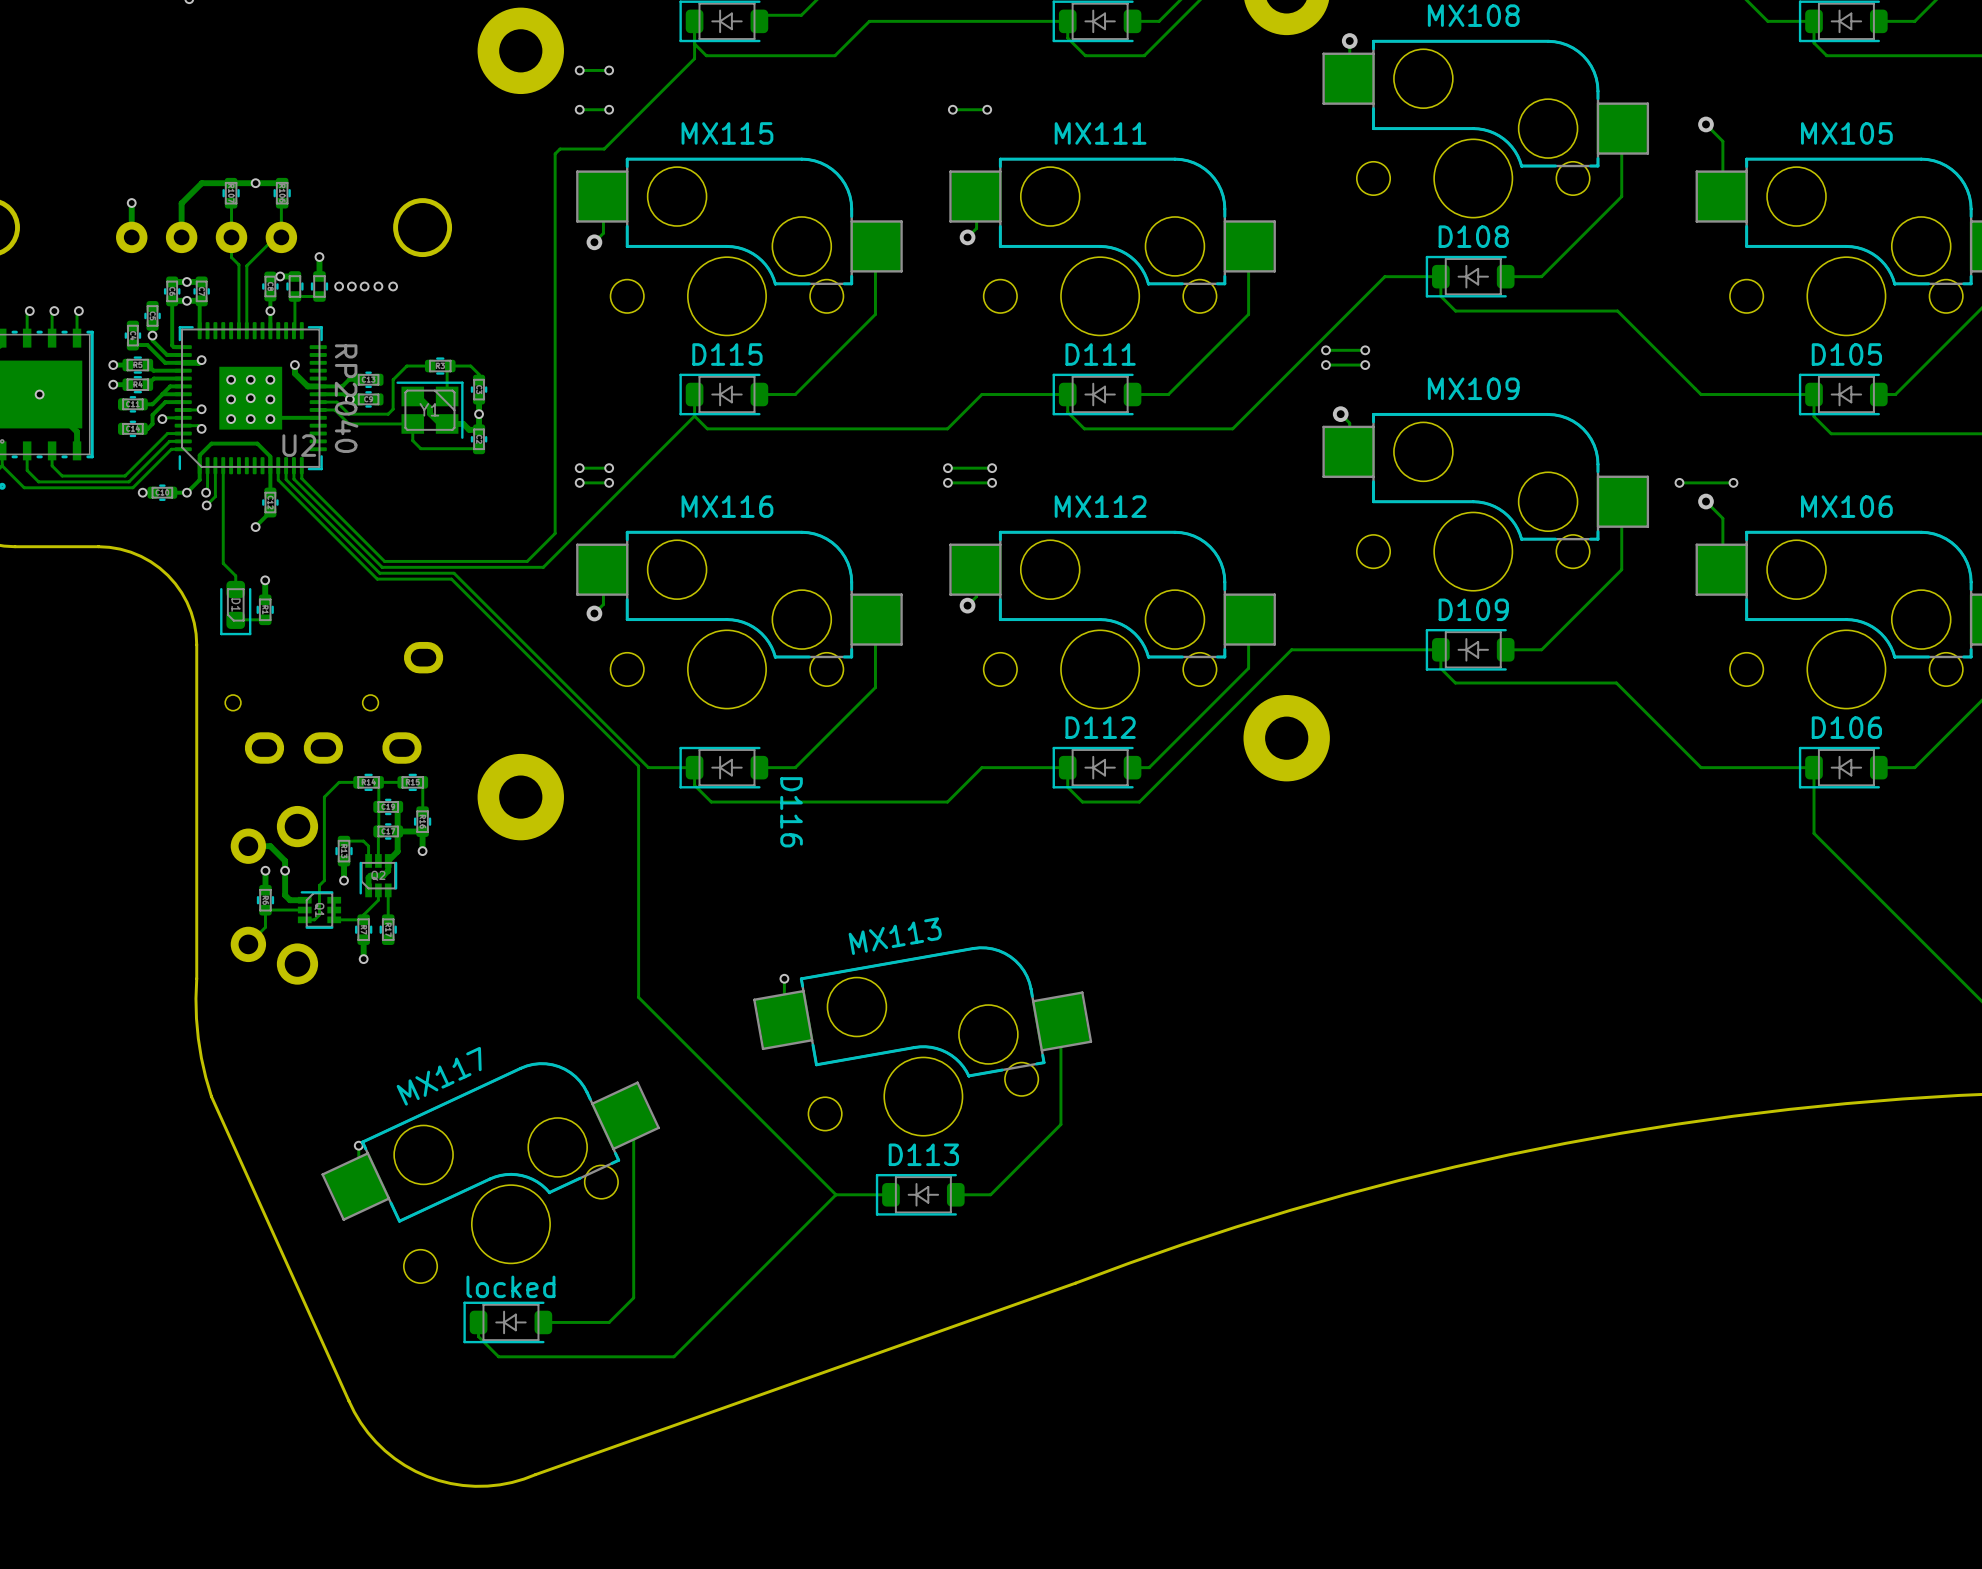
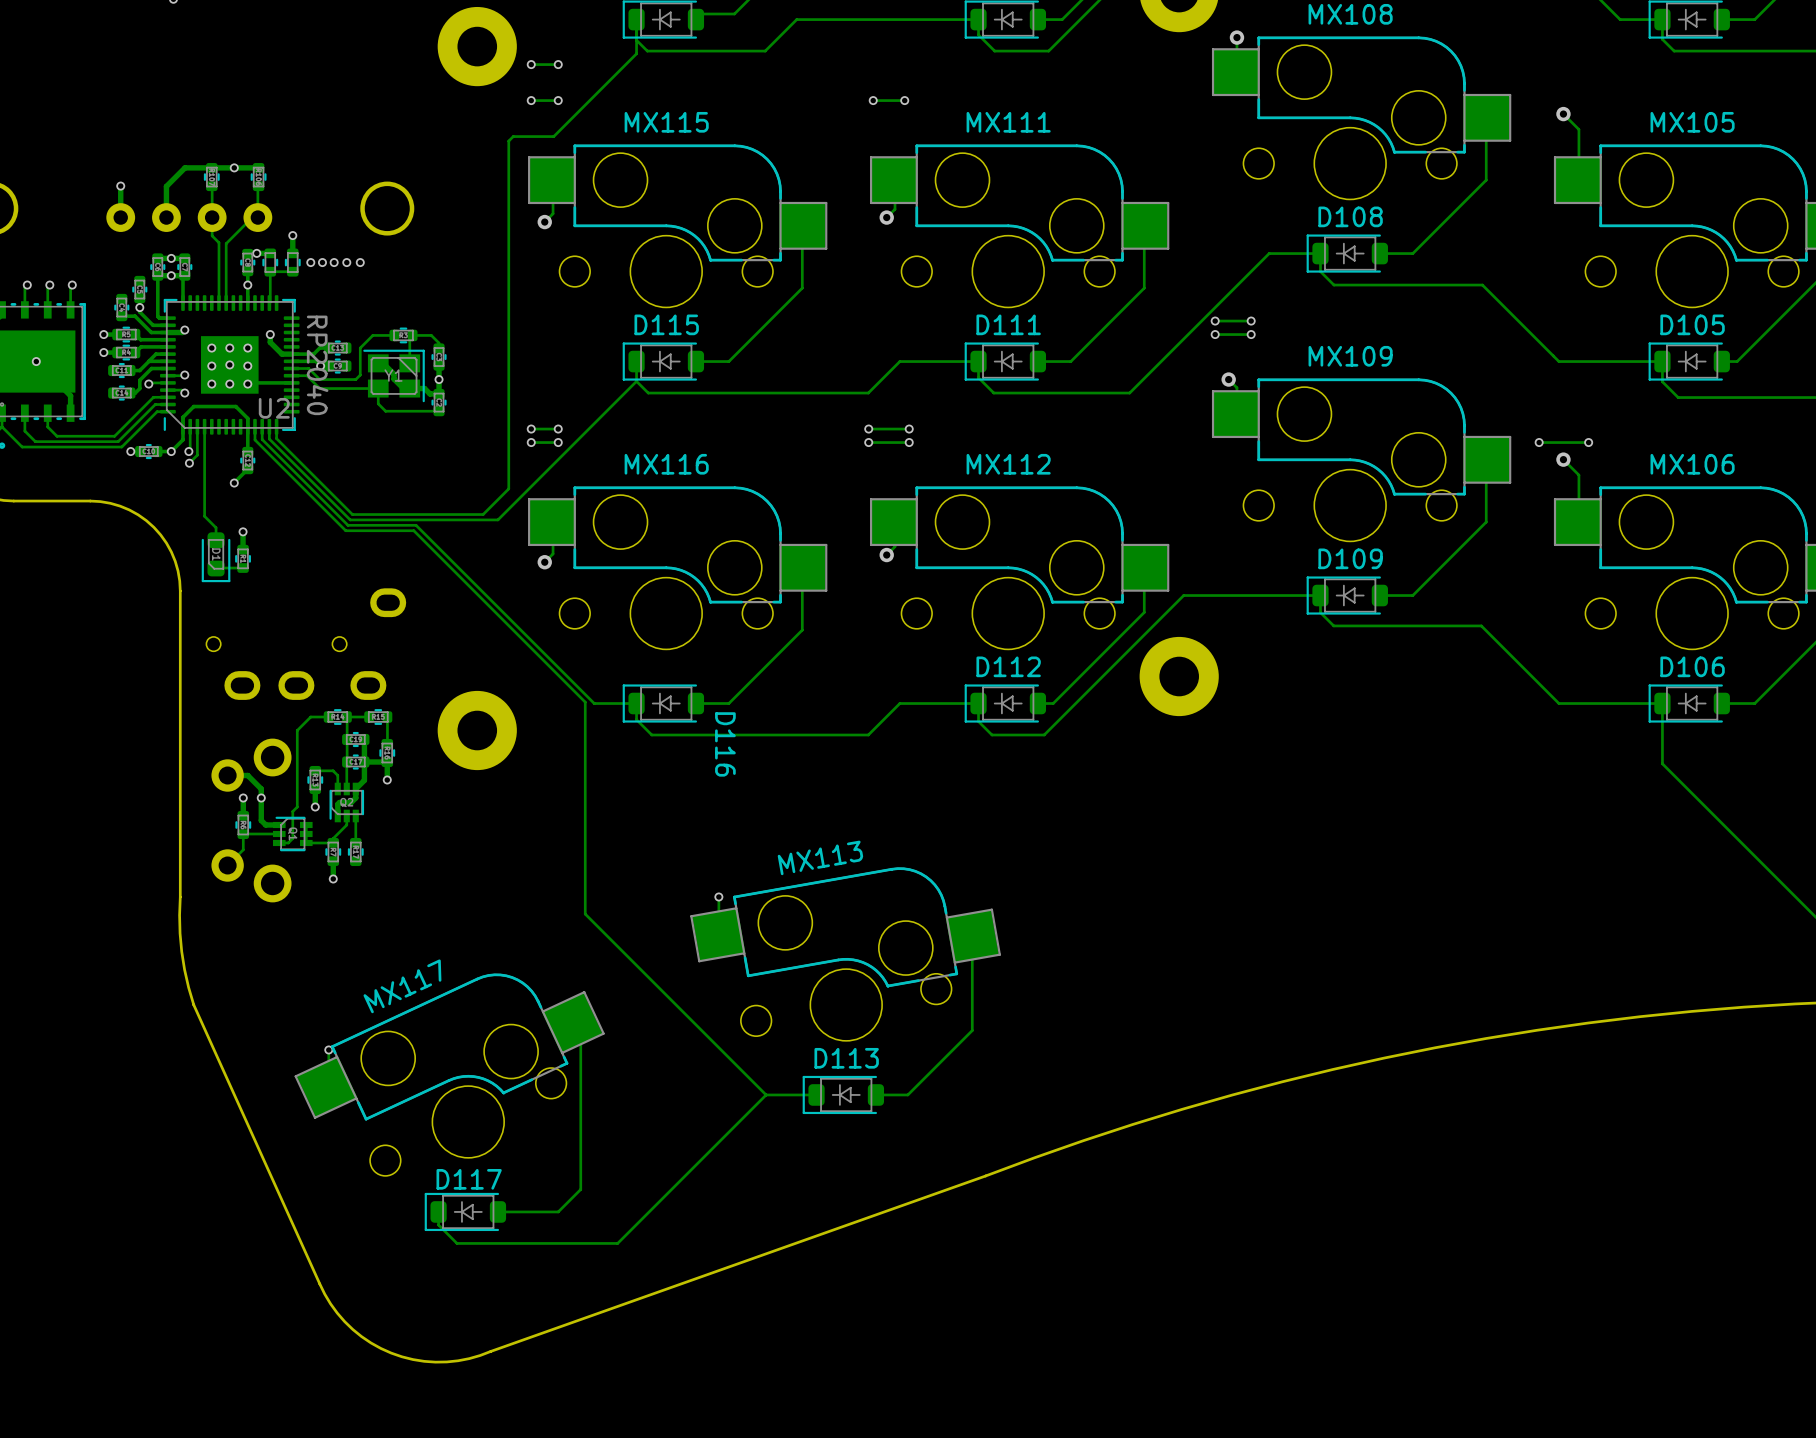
locked name: locked (510, 1286) -> D117 (469, 1179)

